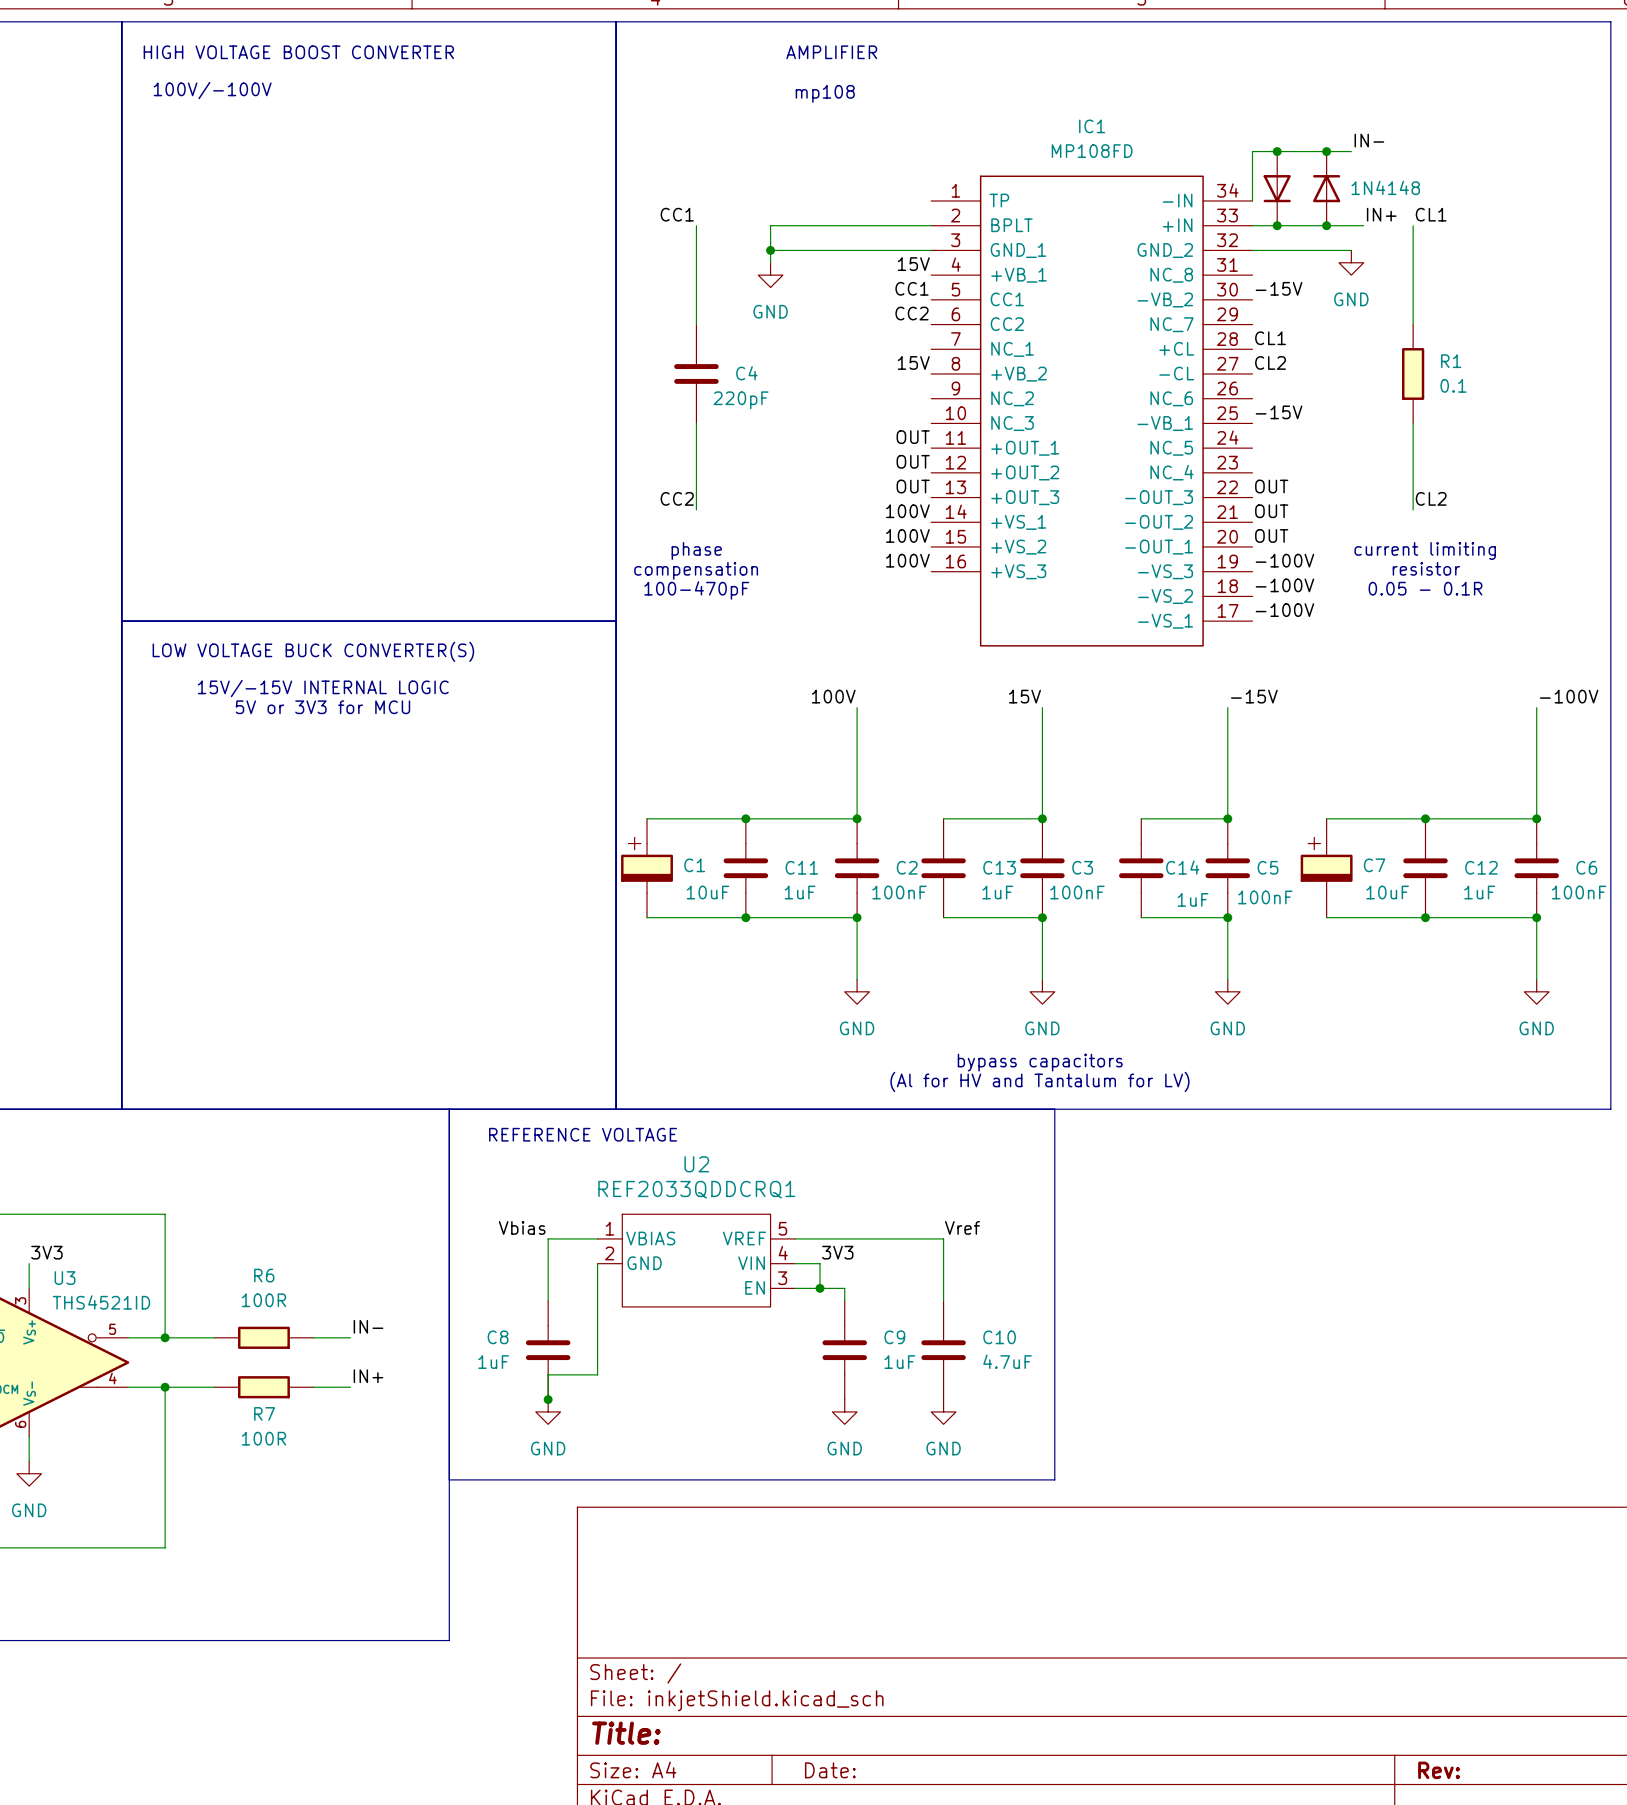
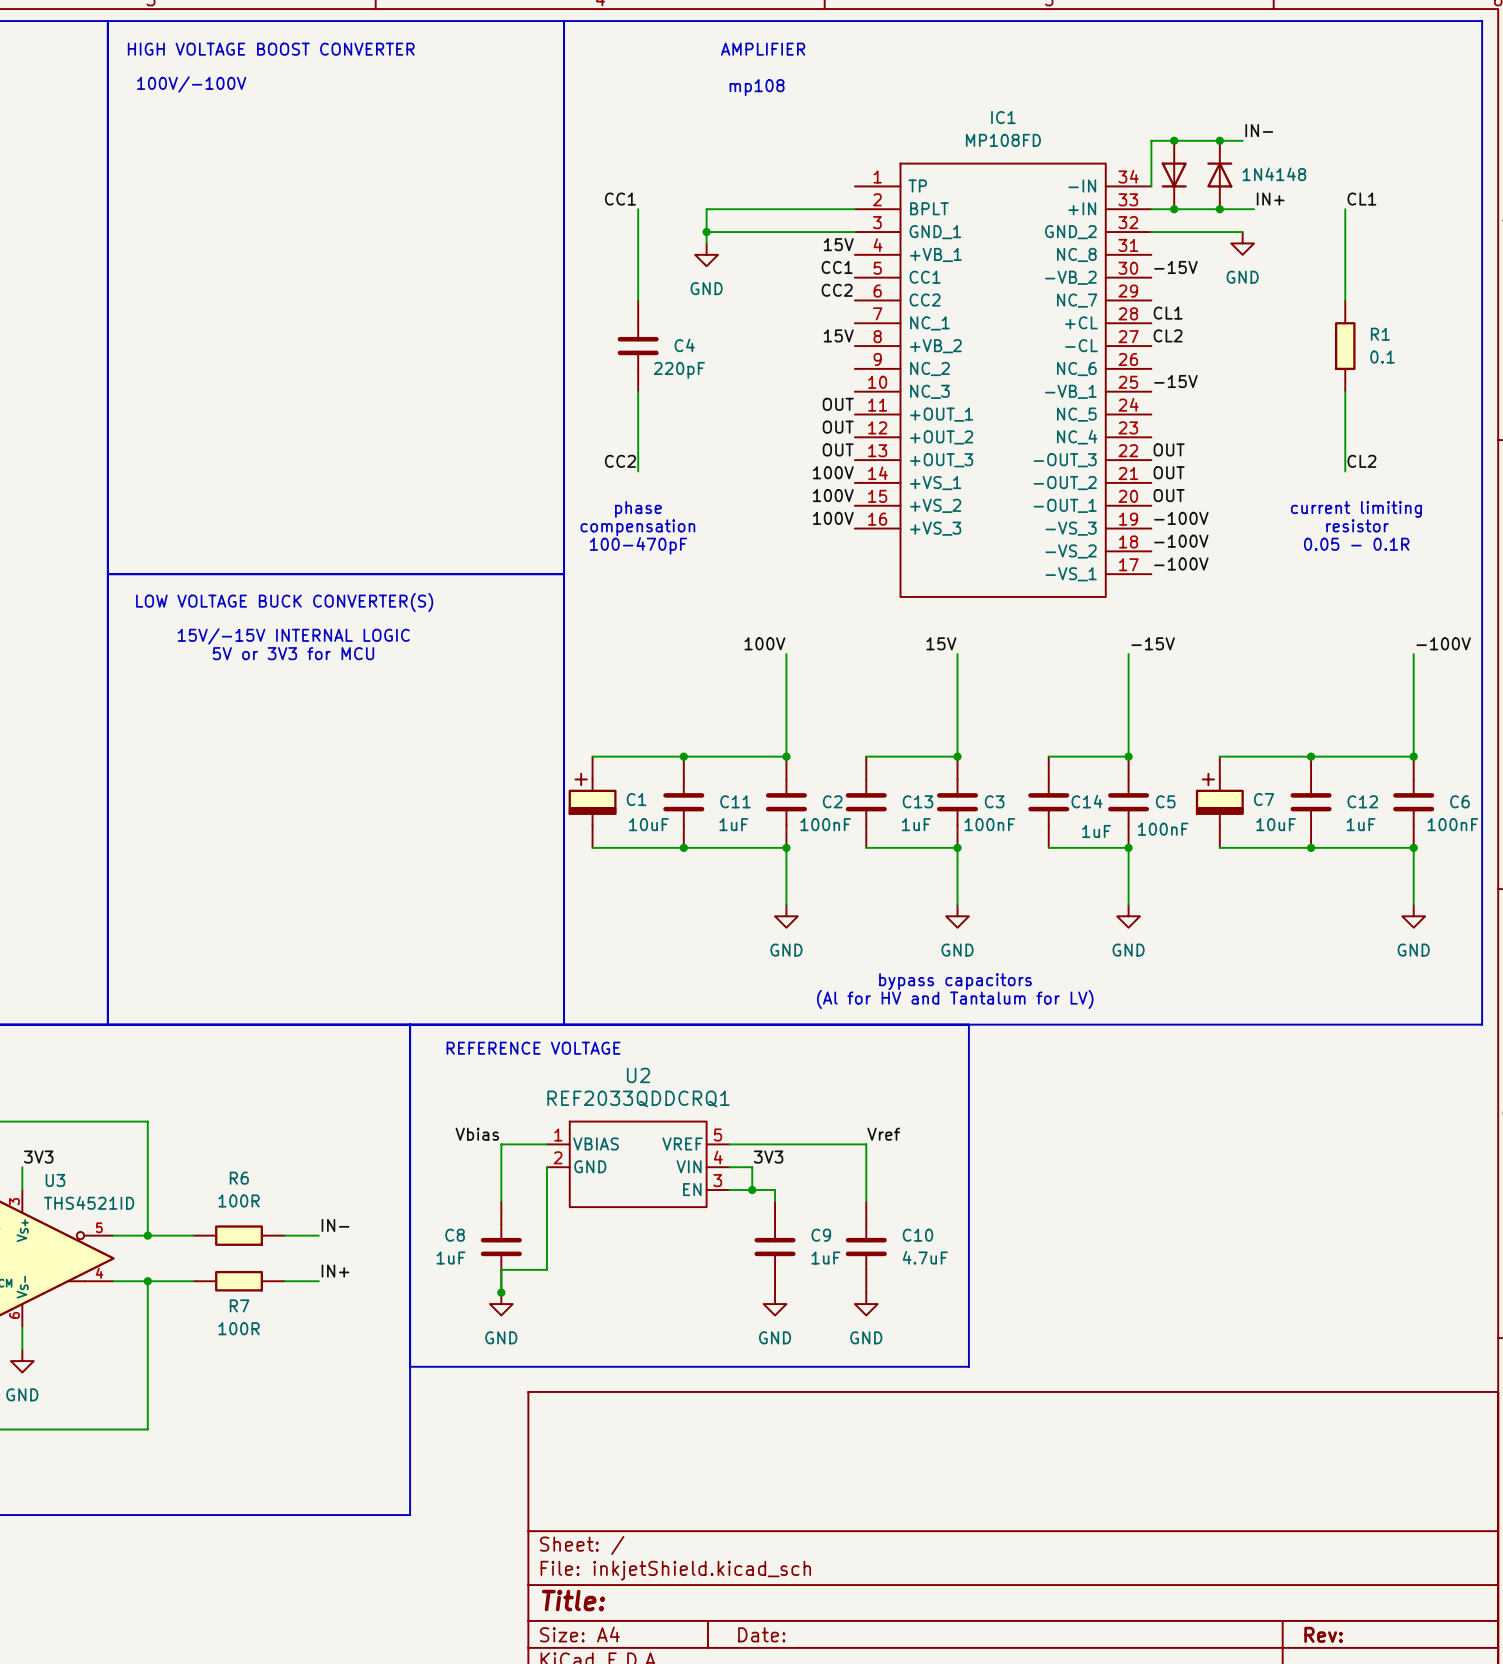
label position: CL1 (1431, 214) -> CL1 (1361, 199)
wire: (1413, 225) (1413, 324) -> (1345, 209) (1345, 300)
R1 position: (1413, 373) -> (1345, 346)
wire: (1413, 423) (1413, 509) -> (1345, 391) (1345, 471)
label position: CL2 (1431, 498) -> CL2 (1361, 461)
text position: current limiting (1425, 550) -> current limiting (1356, 509)
text position: resistor (1426, 568) -> resistor (1357, 525)
text position: 0.05 - 0.1R (1425, 588) -> 0.05 - 0.1R (1356, 544)

